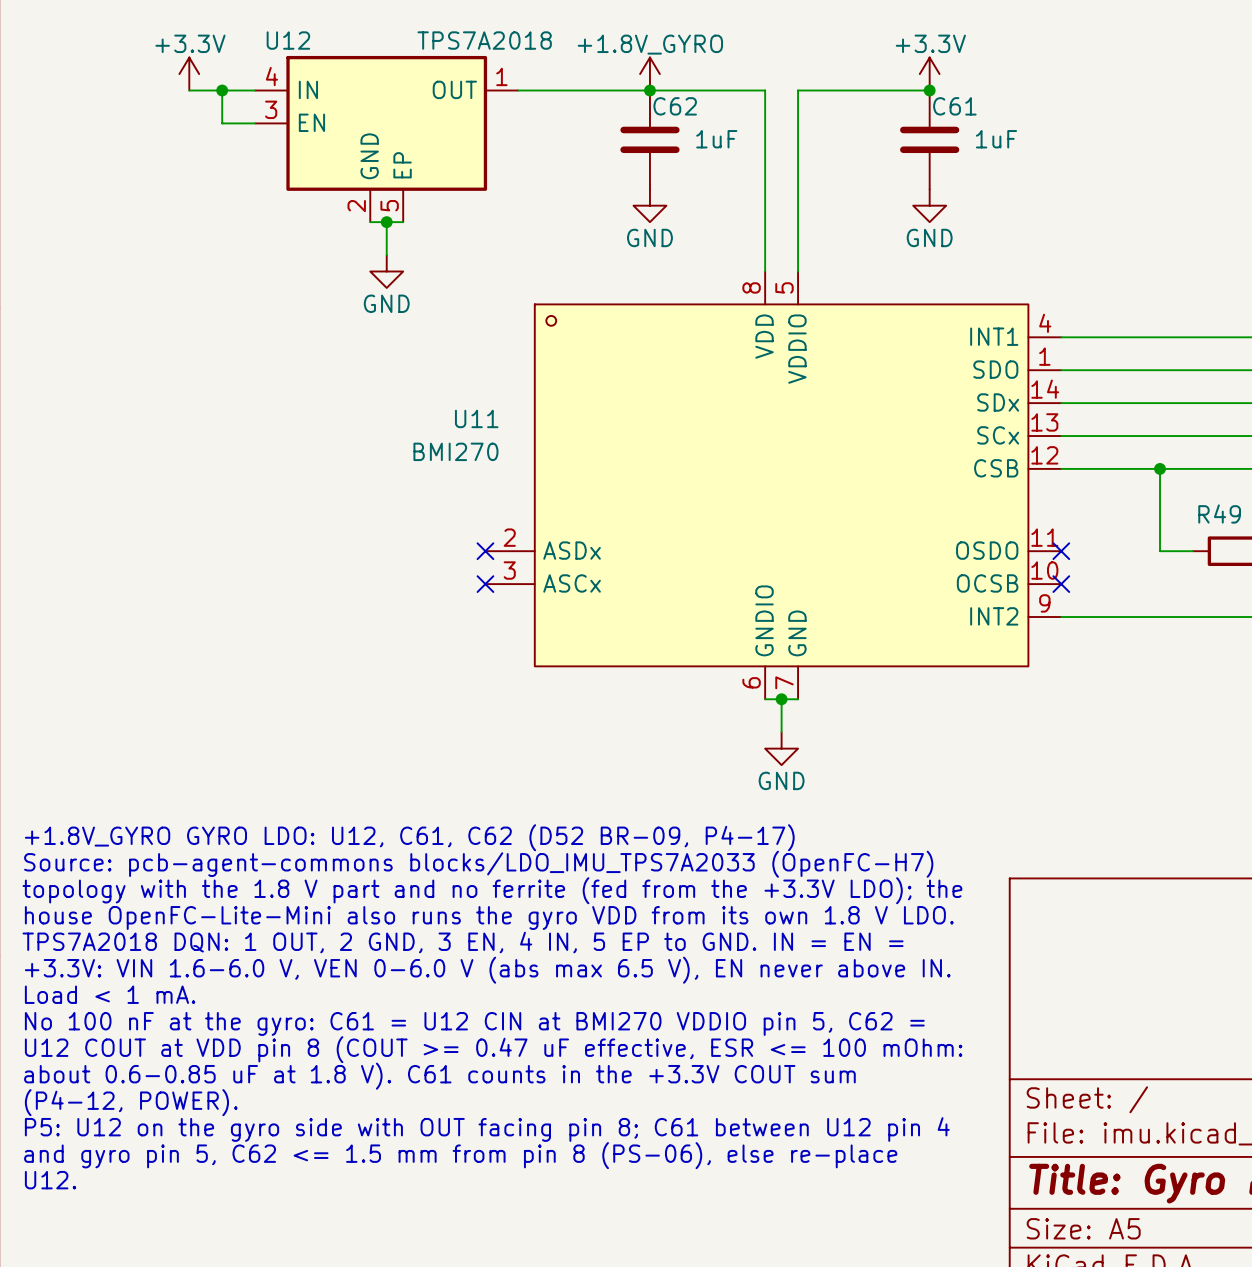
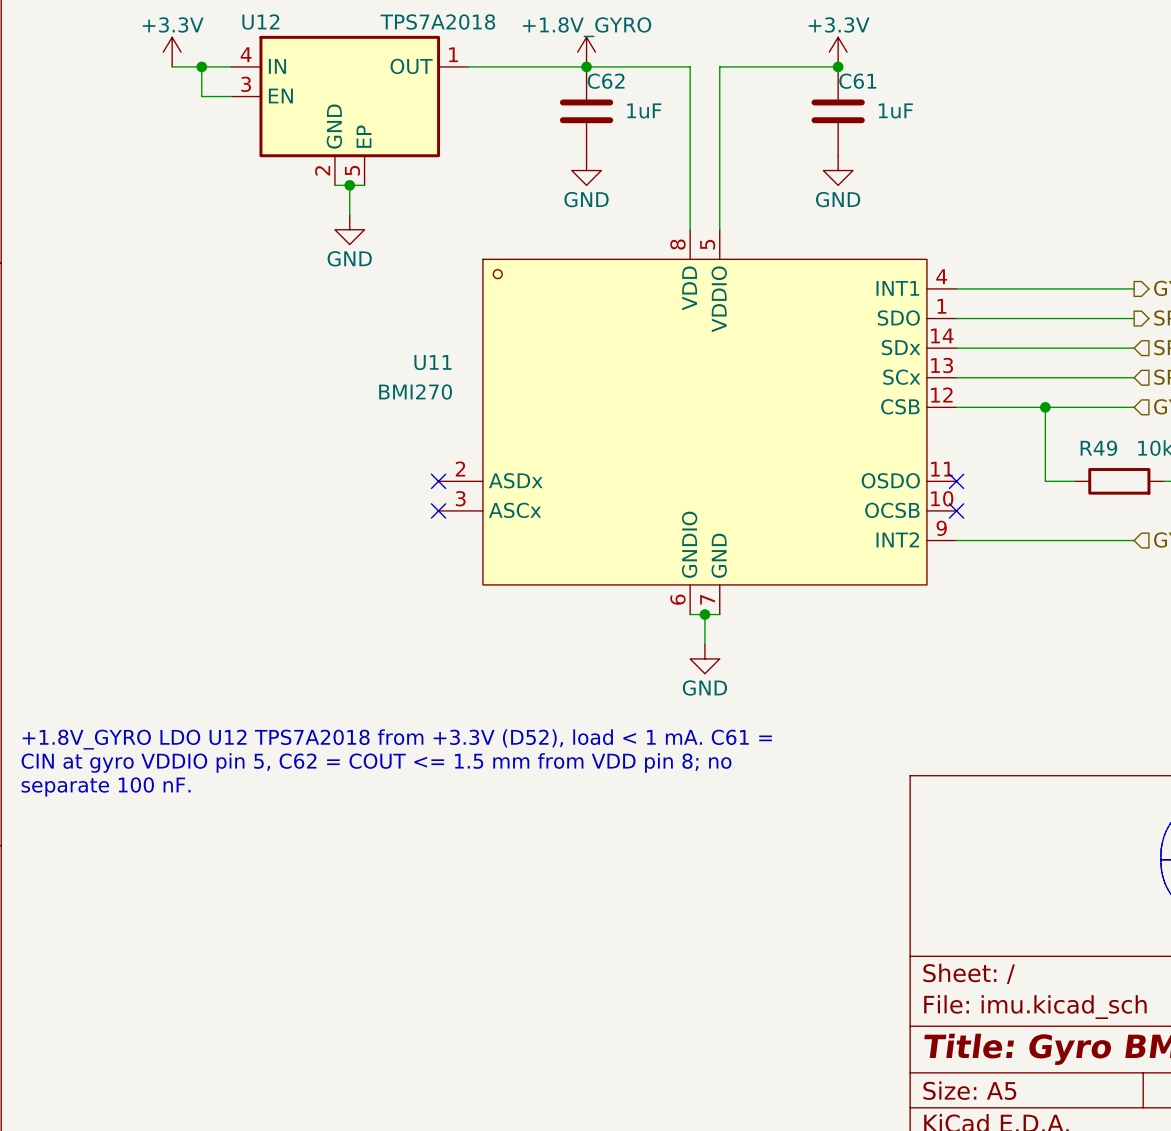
text: +1.8V_GYRO GYRO LDO: U12, C61, C62 (D52 BR-09, P4-17) (409, 837) -> +1.8V_GYRO LDO U12 TPS7A2018 from +3.3V (D52), load < 1 mA. C61 = (397, 739)
text: Source: pcb-agent-commons blocks/LDO_IMU_TPS7A2033 (OpenFC-H7) (478, 864) -> CIN at gyro VDDIO pin 5, C62 = COUT <= 1.5 mm from VDD pin 8; no (376, 762)
text: topology with the 1.8 V part and no ferrite (fed from the +3.3V LDO); the (492, 890) -> separate 100 nF. (106, 786)
text: house OpenFC-Lite-Mini also runs the gyro VDD from its own 1.8 V LDO. (489, 917) -> none
text: TPS7A2018 DQN: 1 OUT, 2 GND, 3 EN, 4 IN, 5 EP to GND. IN = EN = (463, 942) -> none
text: +3.3V: VIN 1.6-6.0 V, VEN 0-6.0 V (abs max 6.5 V), EN never above IN. (487, 970) -> none
text: Load < 1 mA. (110, 994) -> none
text: No 100 nF at the gyro: C61 = U12 CIN at BMI270 VDDIO pin 5, C62 = (474, 1023) -> none
text: U12 COUT at VDD pin 8 (COUT >= 0.47 uF effective, ESR <= 100 mOhm: (493, 1049) -> none
text: about 0.6-0.85 uF at 1.8 V). C61 counts in the +3.3V COUT sum (439, 1076) -> none
text: (P4-12, POWER). (131, 1102) -> none
text: P5: U12 on the gyro side with OUT facing pin 8; C61 between U12 pin 4 (487, 1129) -> none
text: and gyro pin 5, C62 <= 1.5 mm from pin 8 (PS-06), else re-place (460, 1155) -> none
text: U12. (50, 1180) -> none

